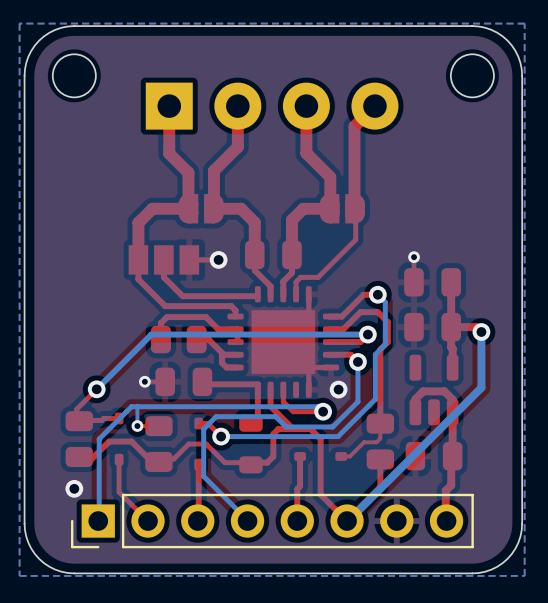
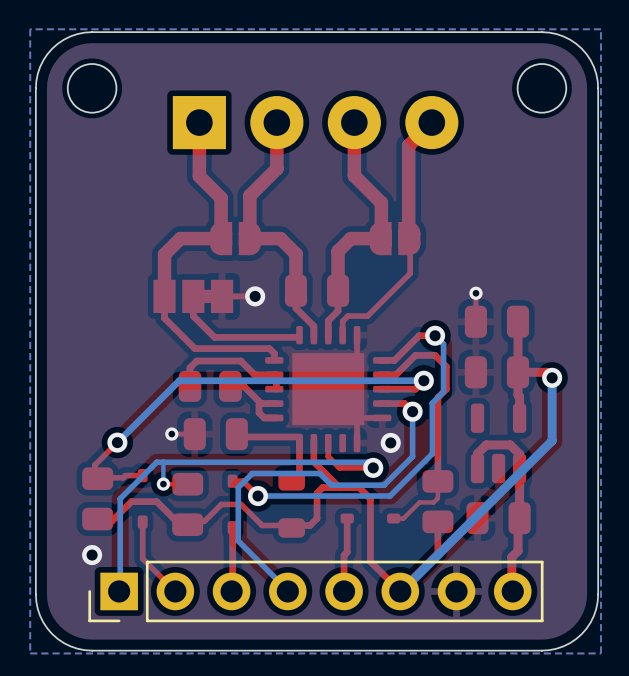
part footprint: [128, 245, 200, 275] -> [153, 279, 234, 314]

